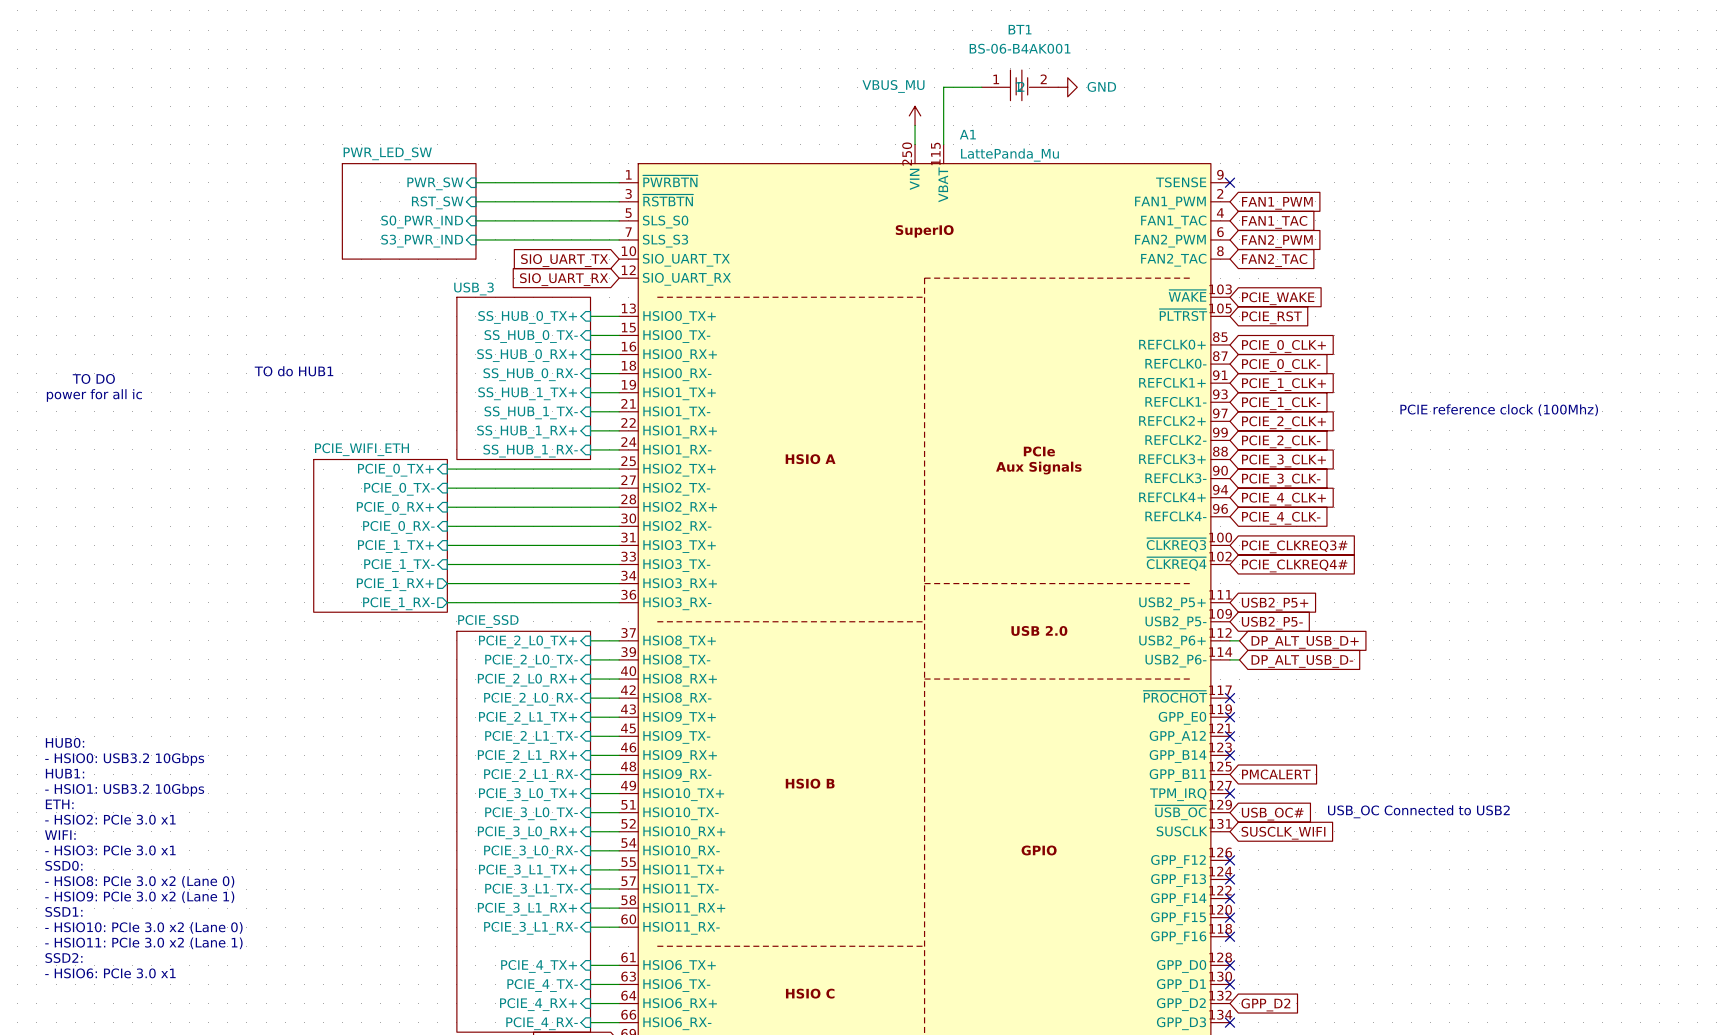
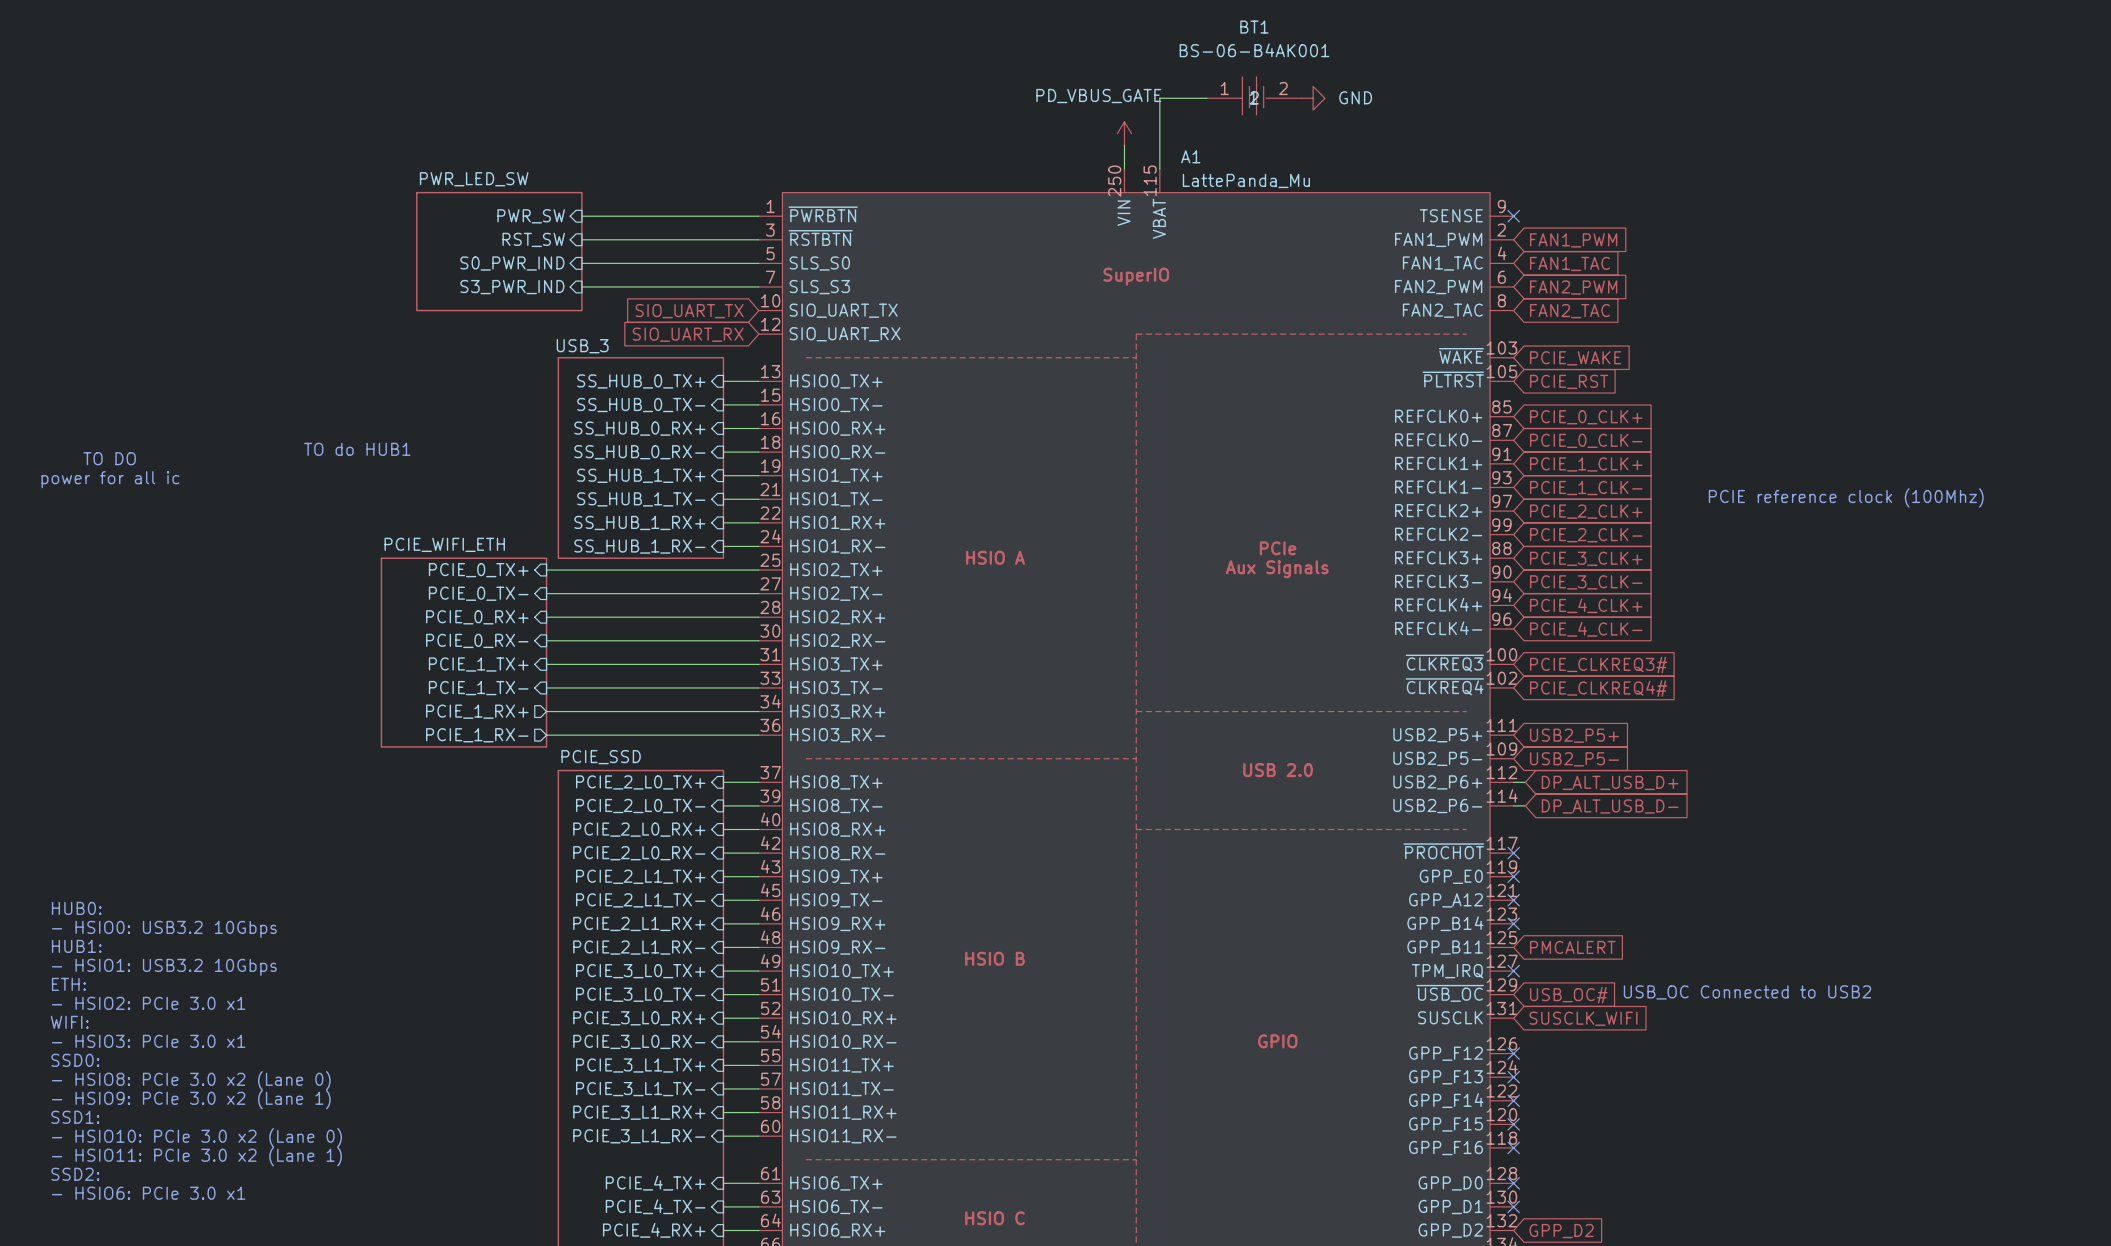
power symbol: VBUS_MU (915, 115) -> PD_VBUS_GATE (1124, 133)

